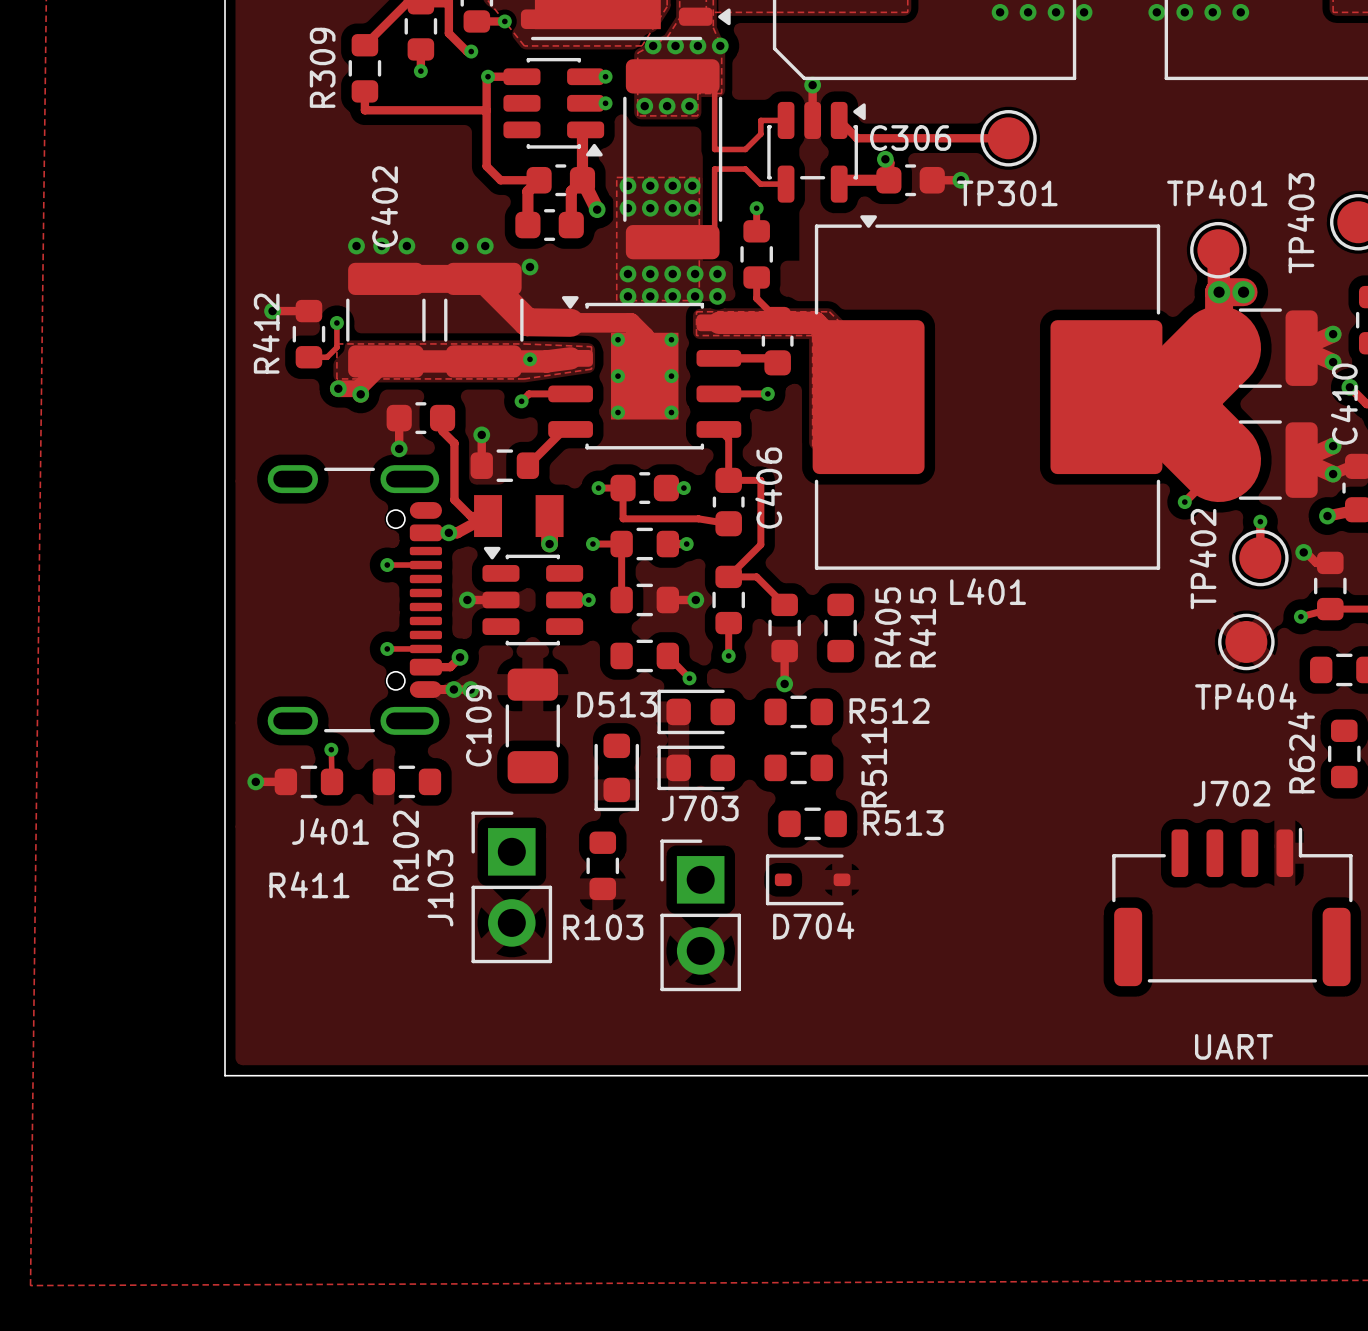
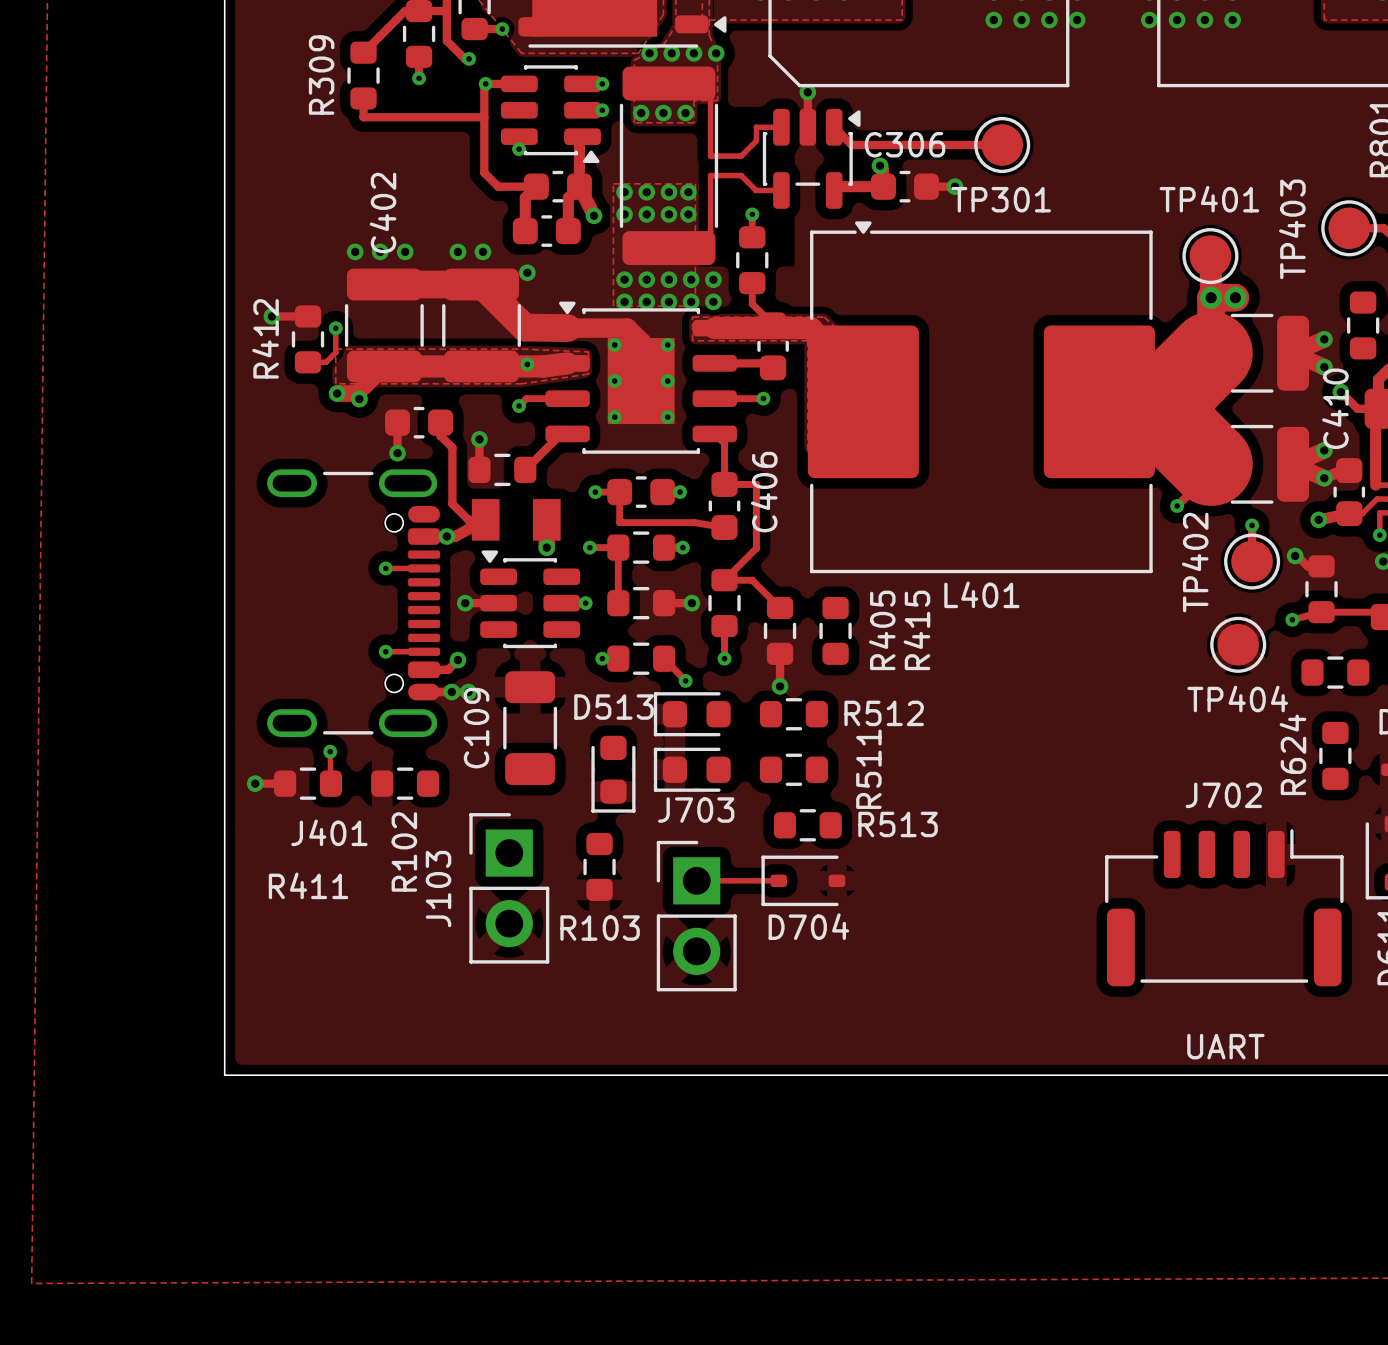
via: none -> (519, 149)
via: none -> (602, 658)
track: none -> (696, 880) (778, 880)

